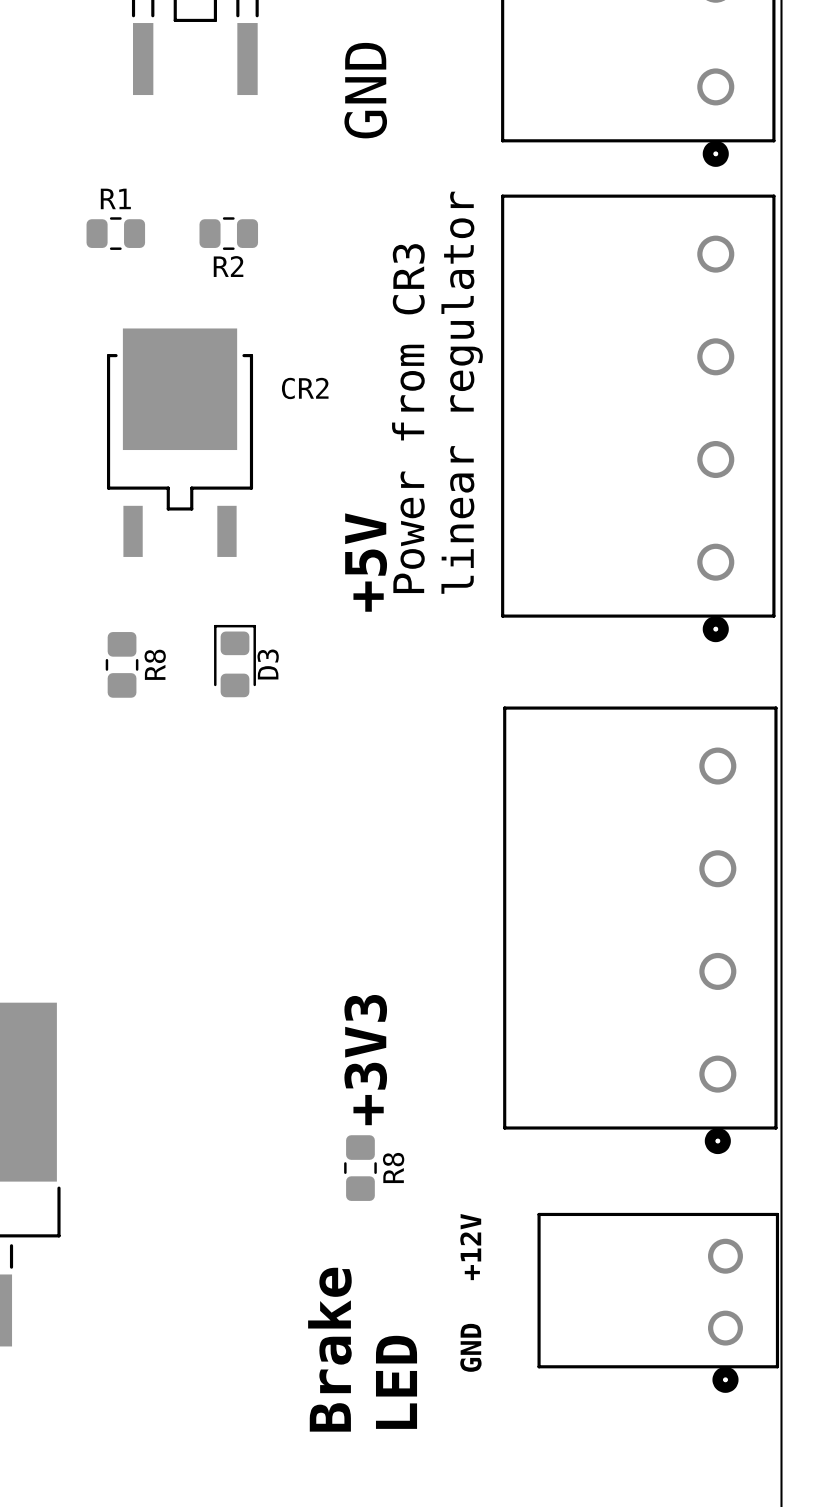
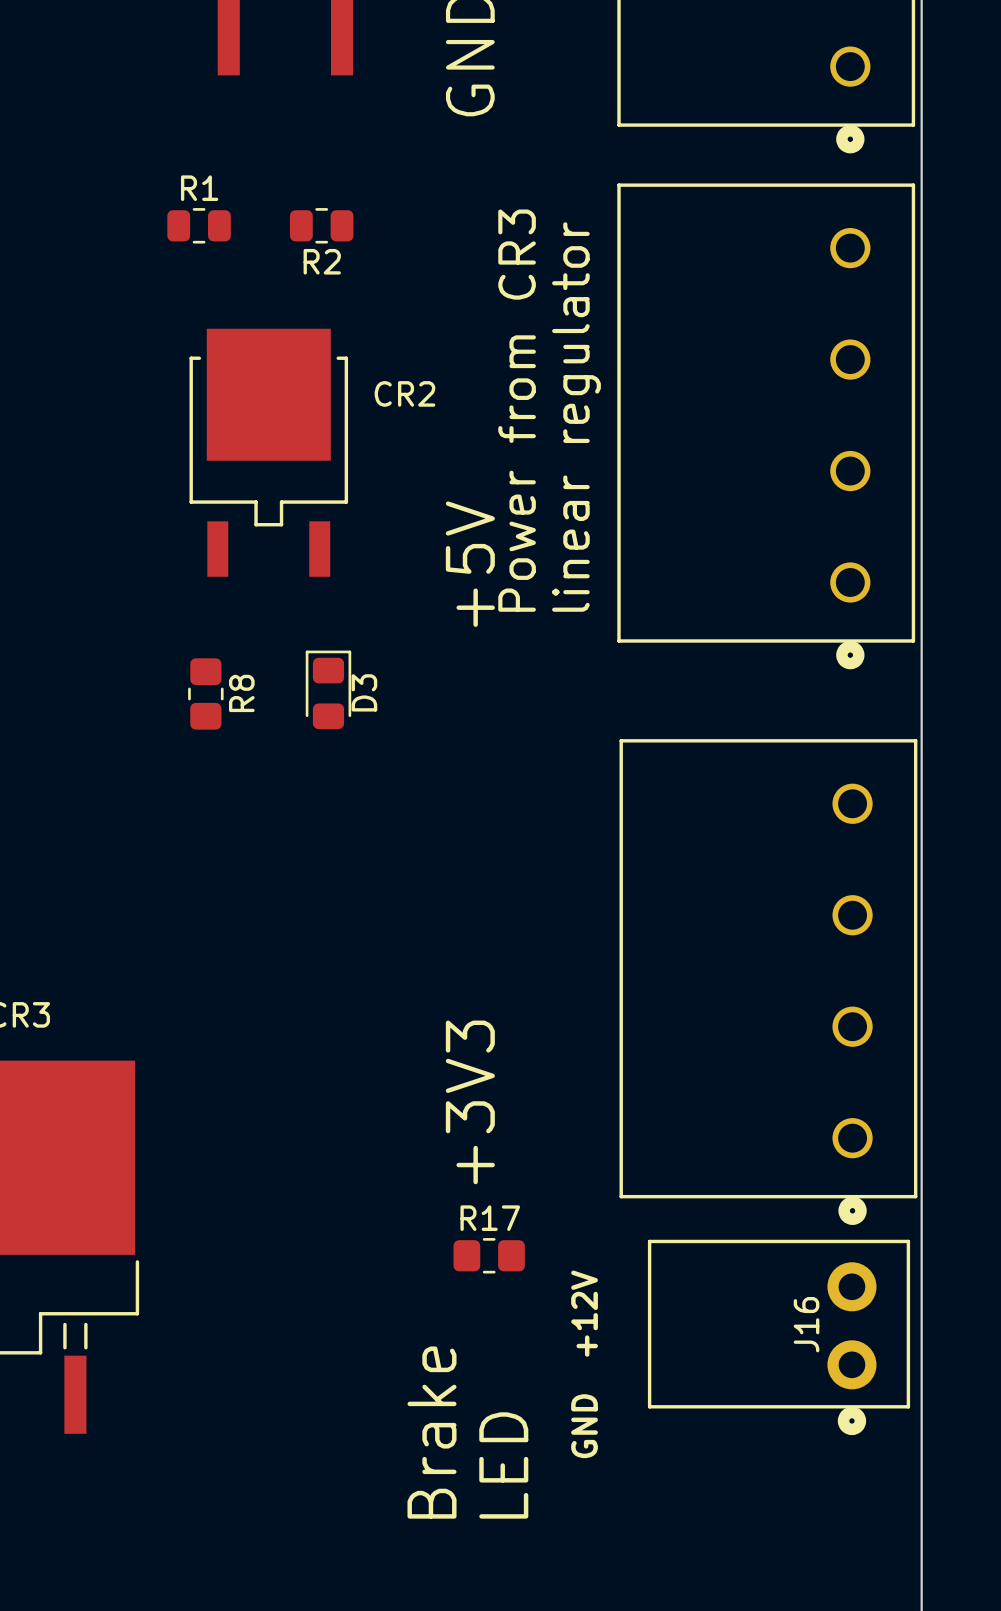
R8: (360, 1168) -> none
R17: none -> (489, 1255)
J16: none -> (778, 1337)
part: (658, 1302) -> none

